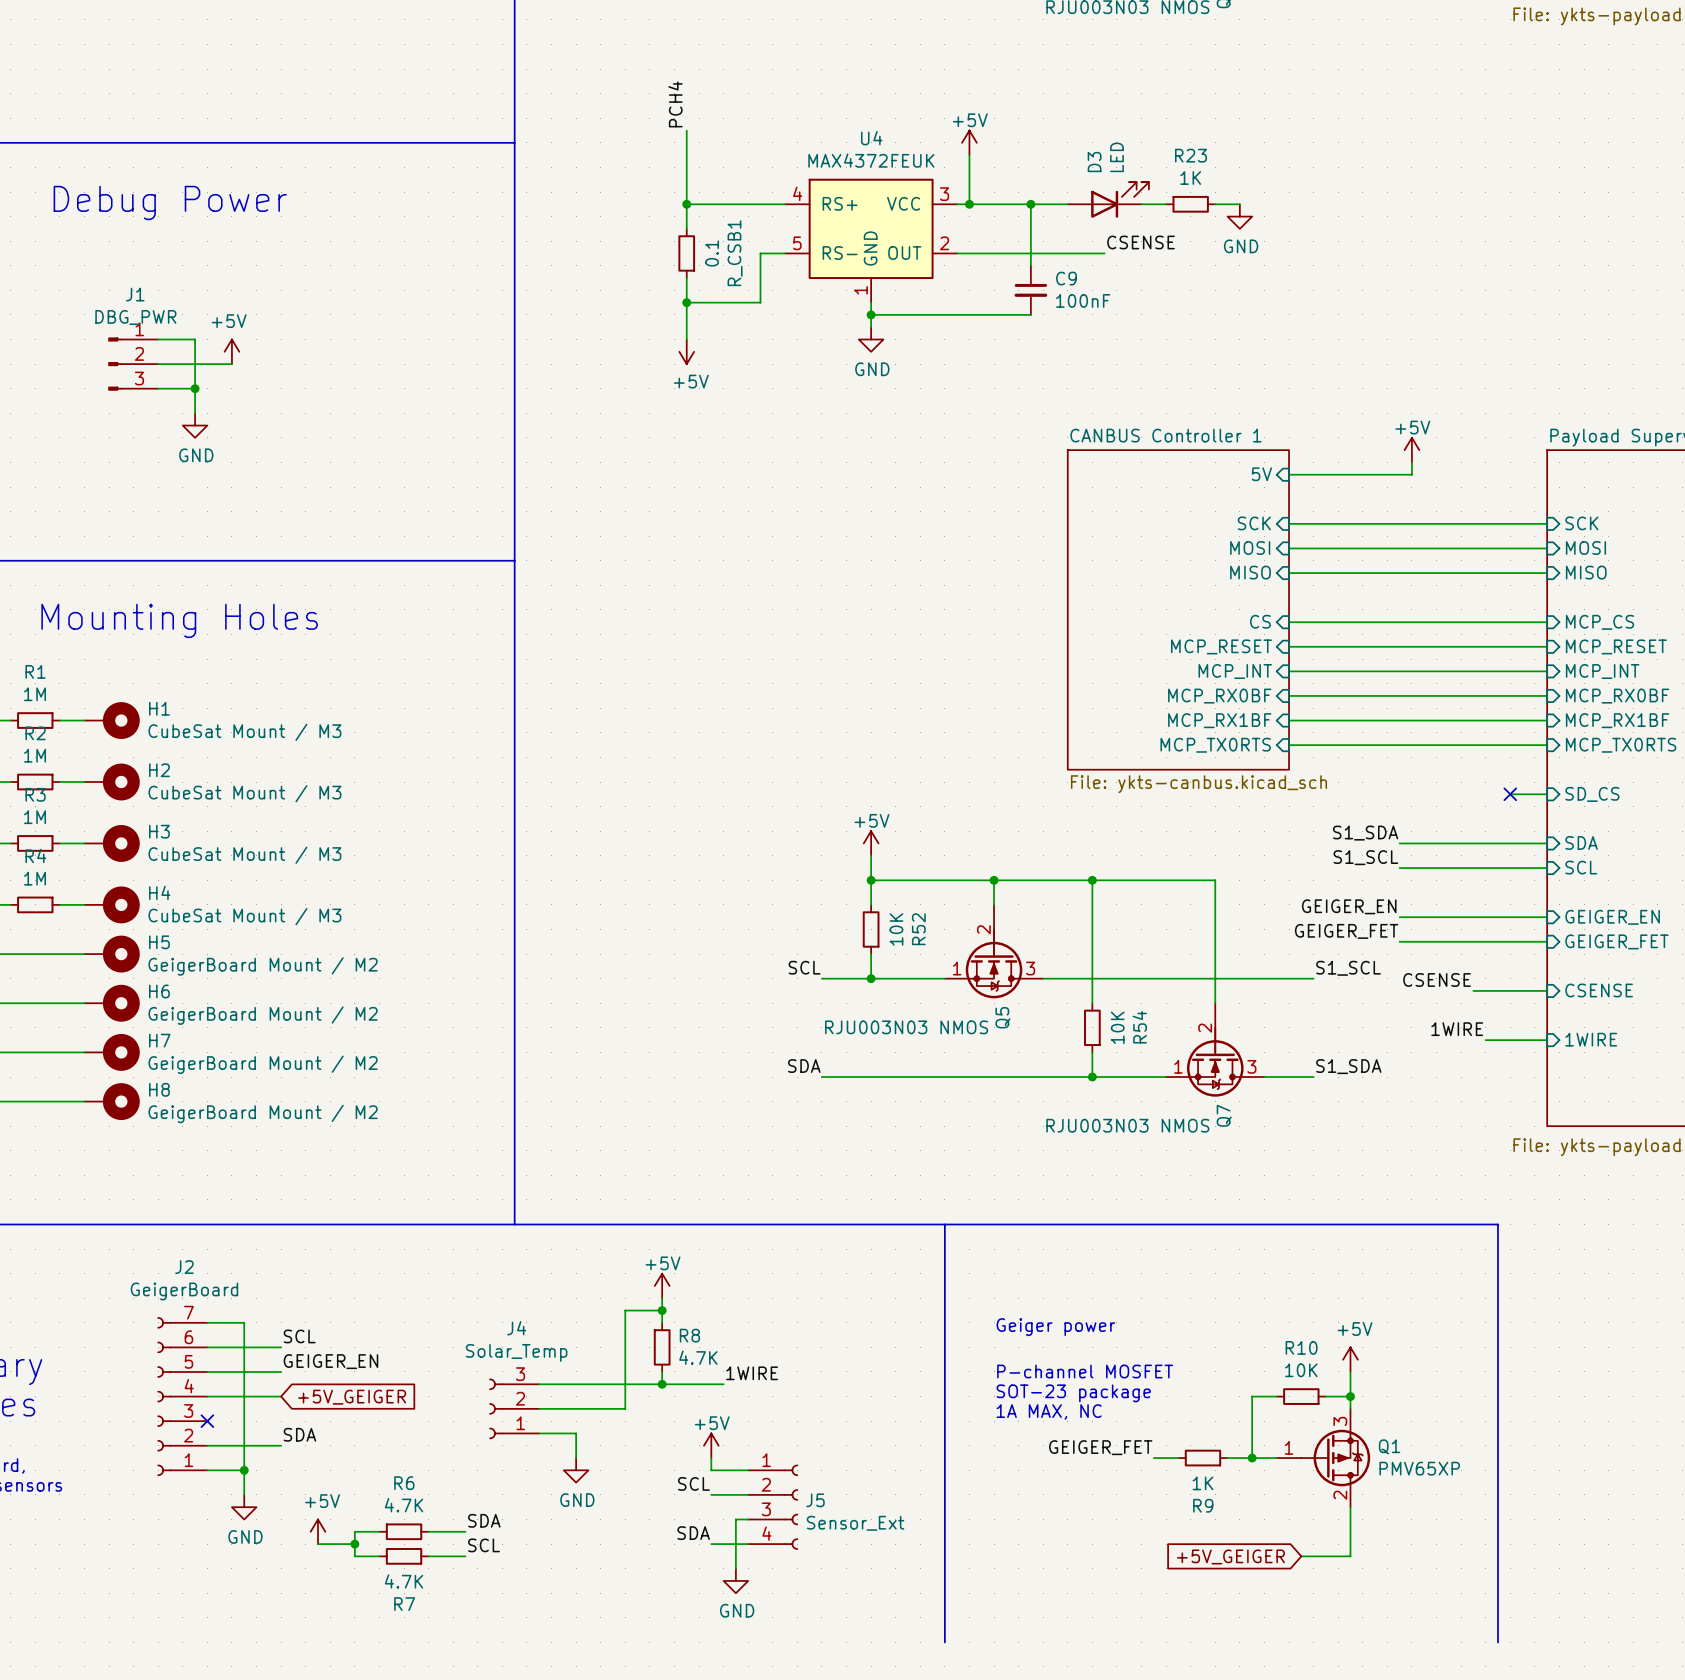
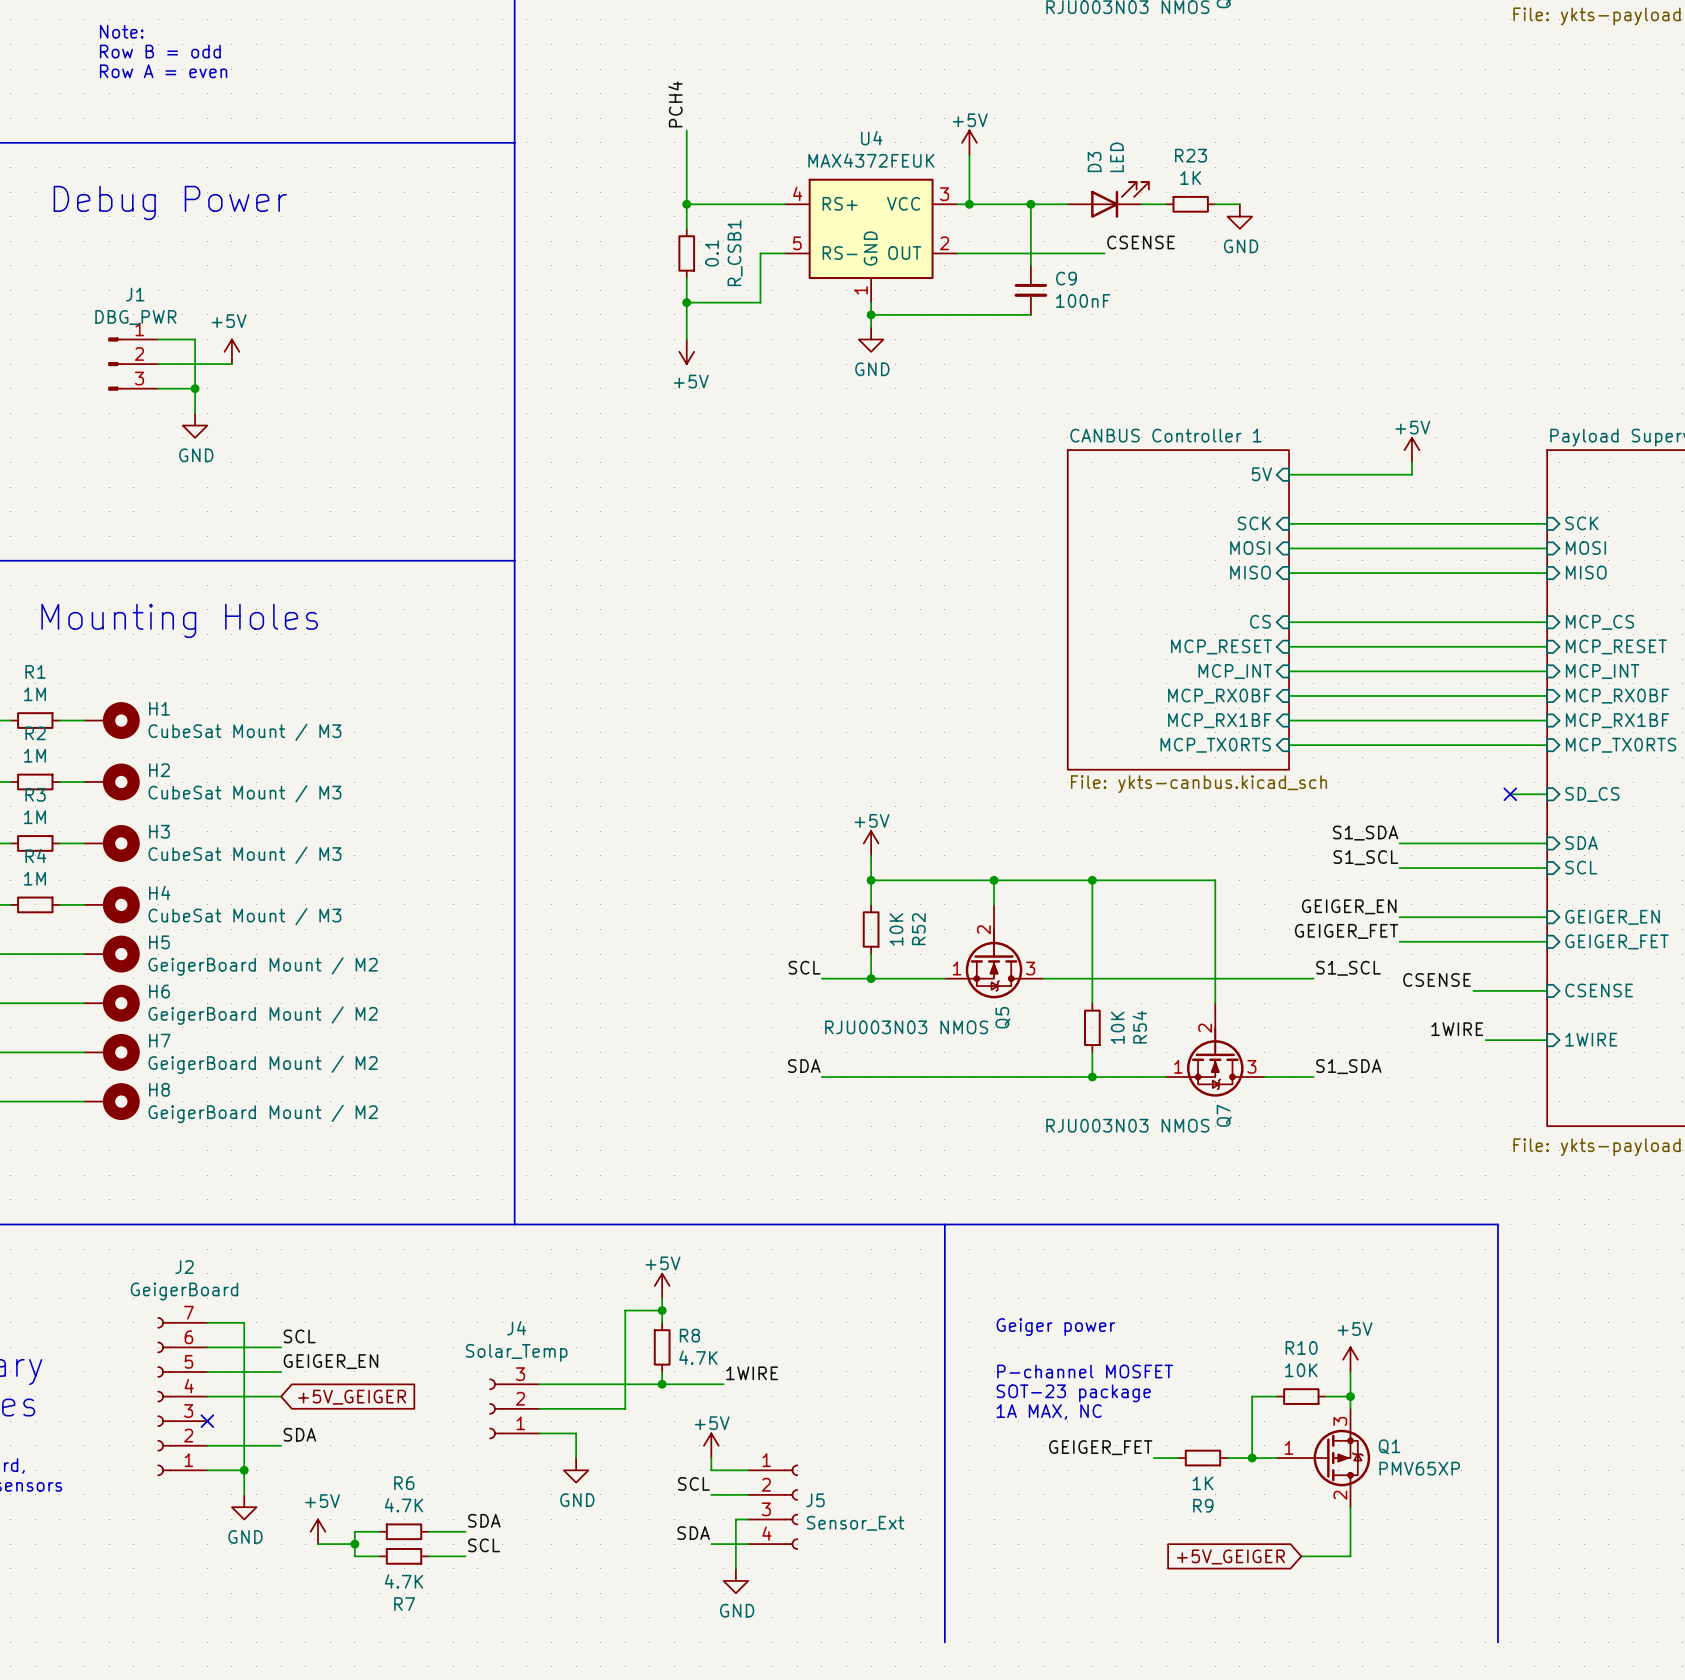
text: none -> Note: (121, 31)
text: none -> Row B = odd (160, 51)
text: none -> Row A = even (163, 71)

